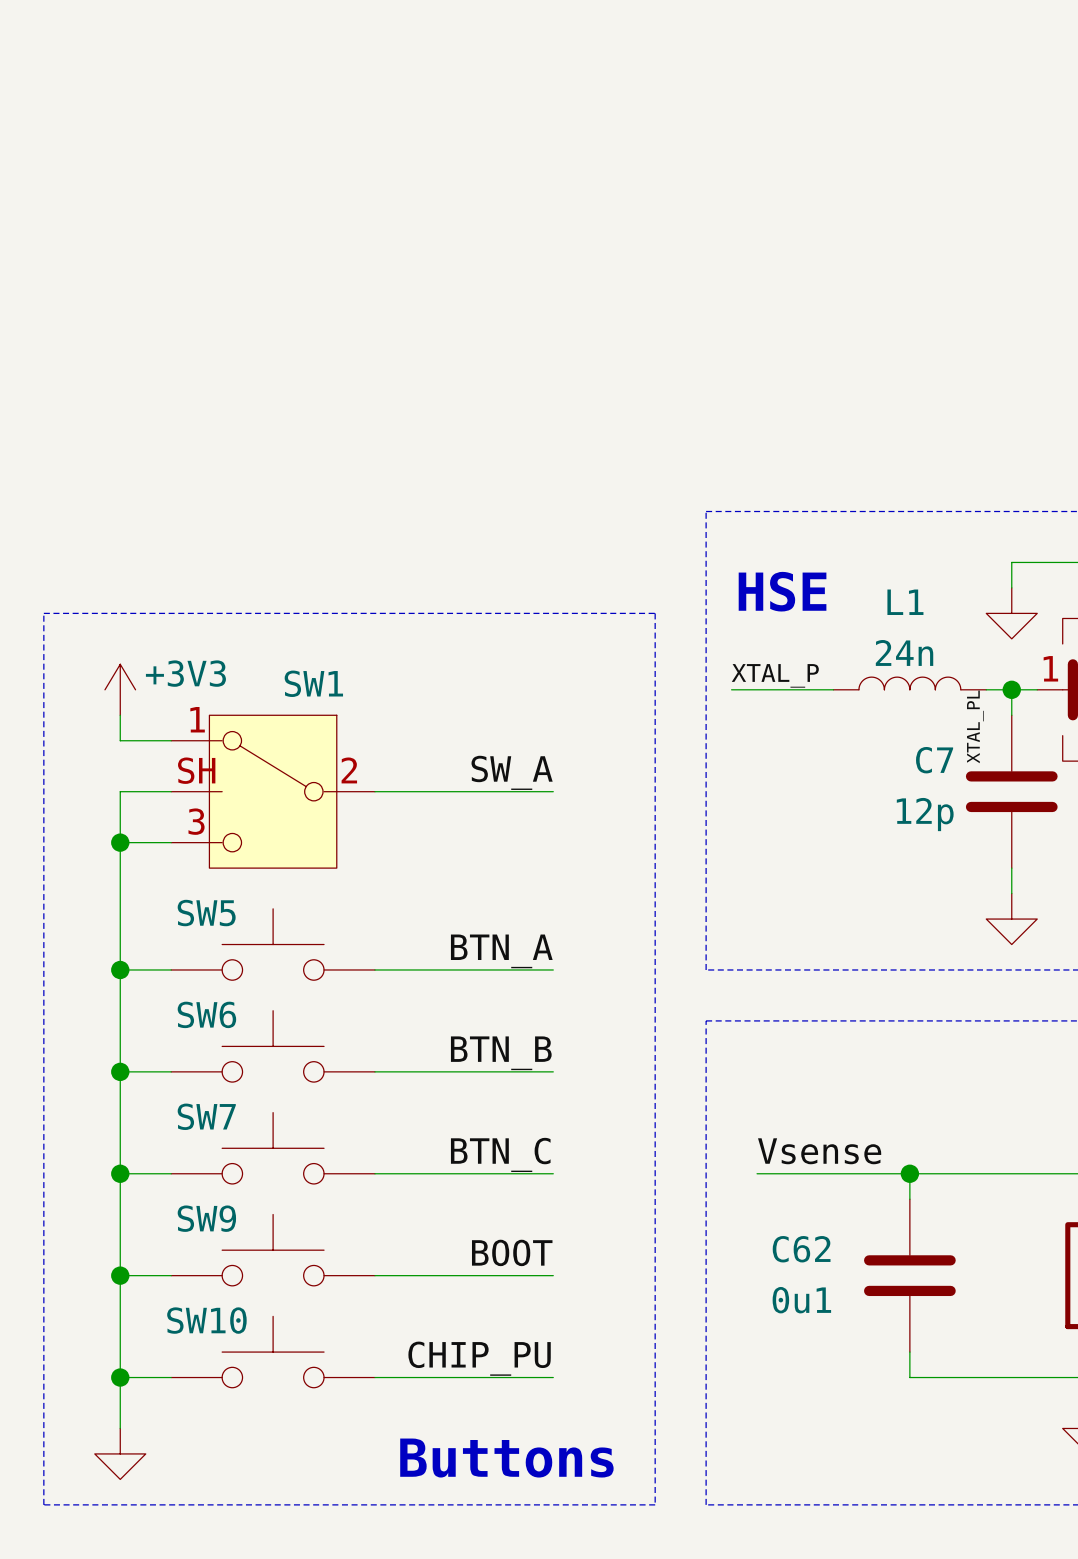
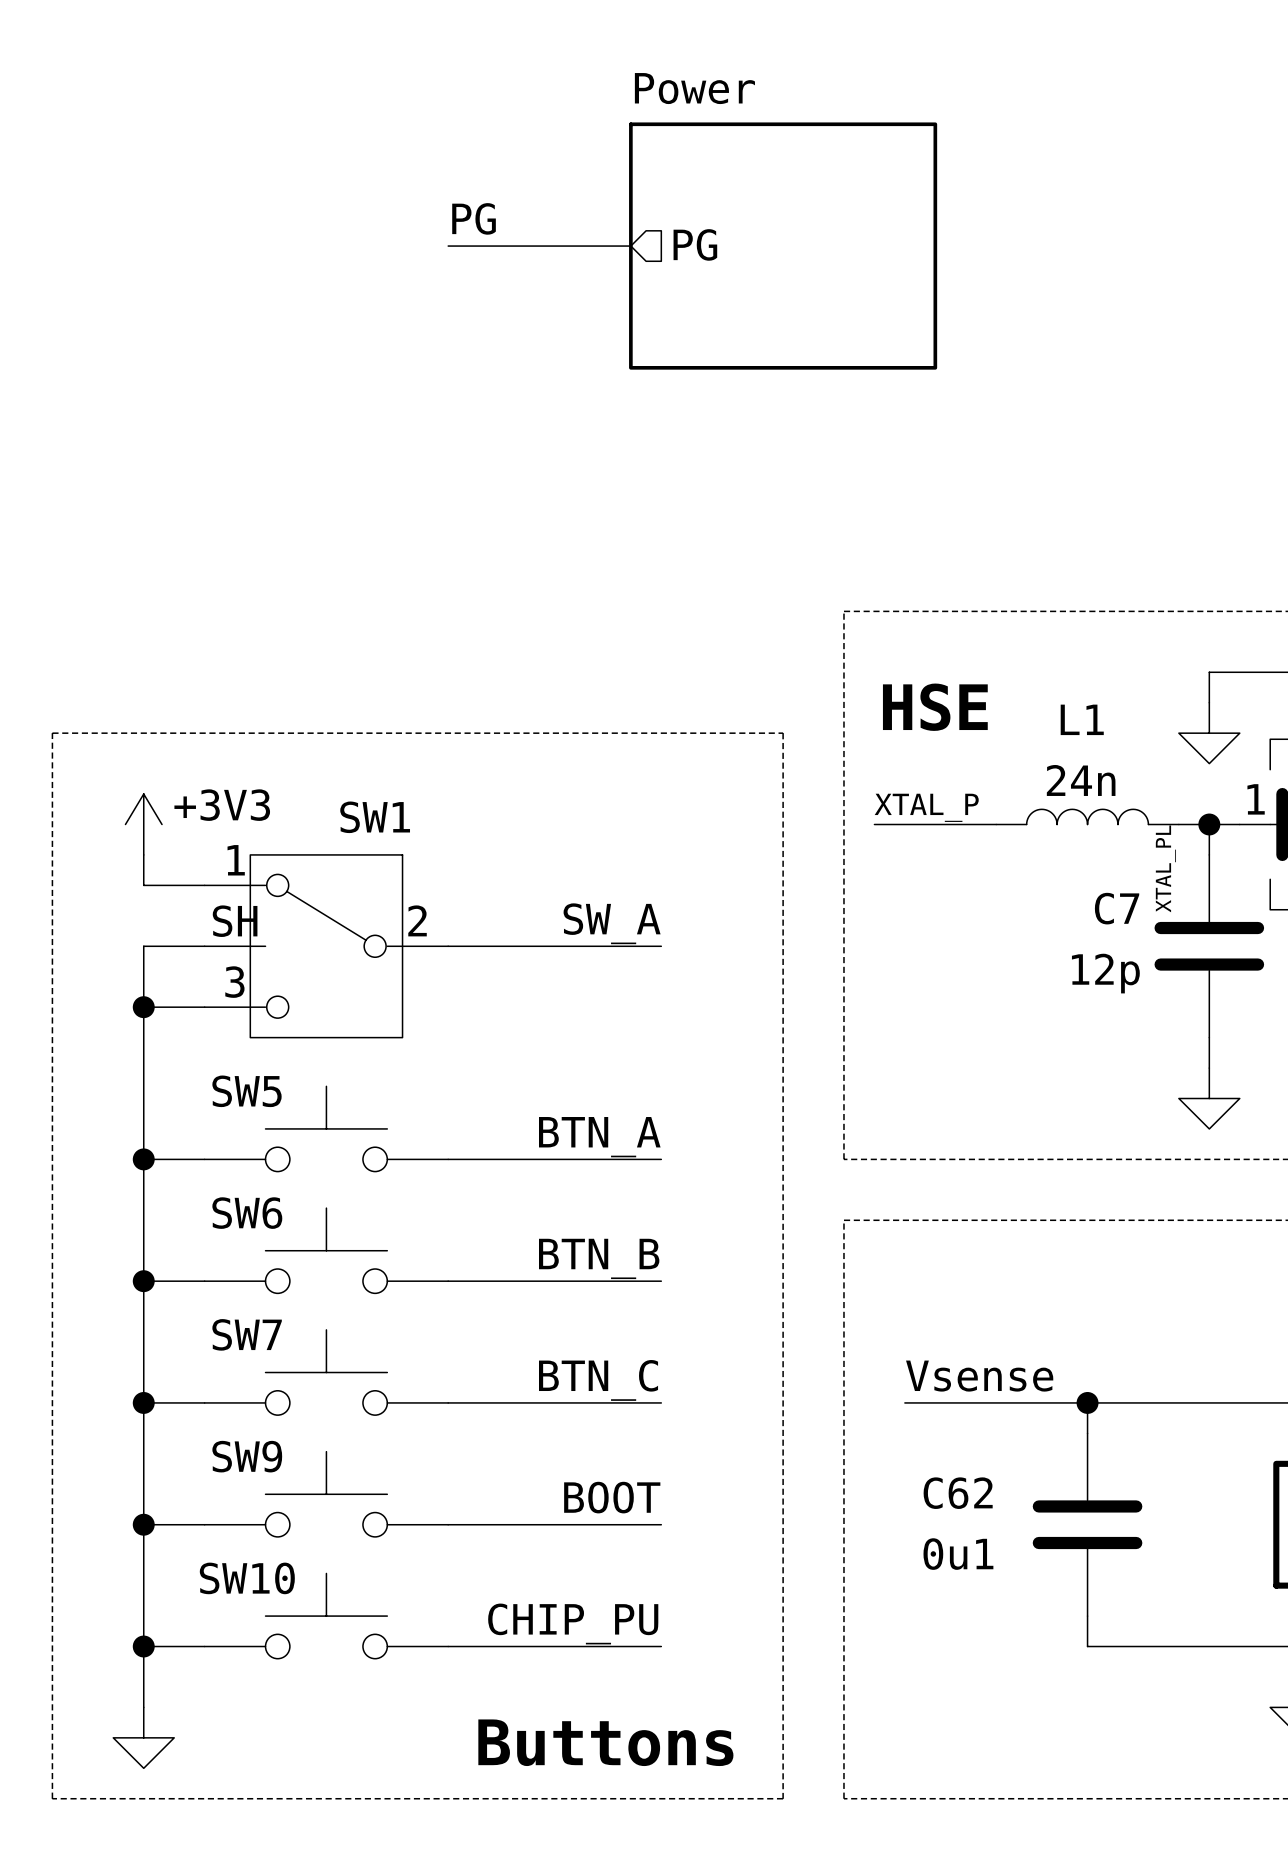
label: none -> PG (474, 218)
sheet pin: none -> PG (695, 244)
wire: none -> (448, 246) (630, 246)
sheet Power: none -> (783, 246)

